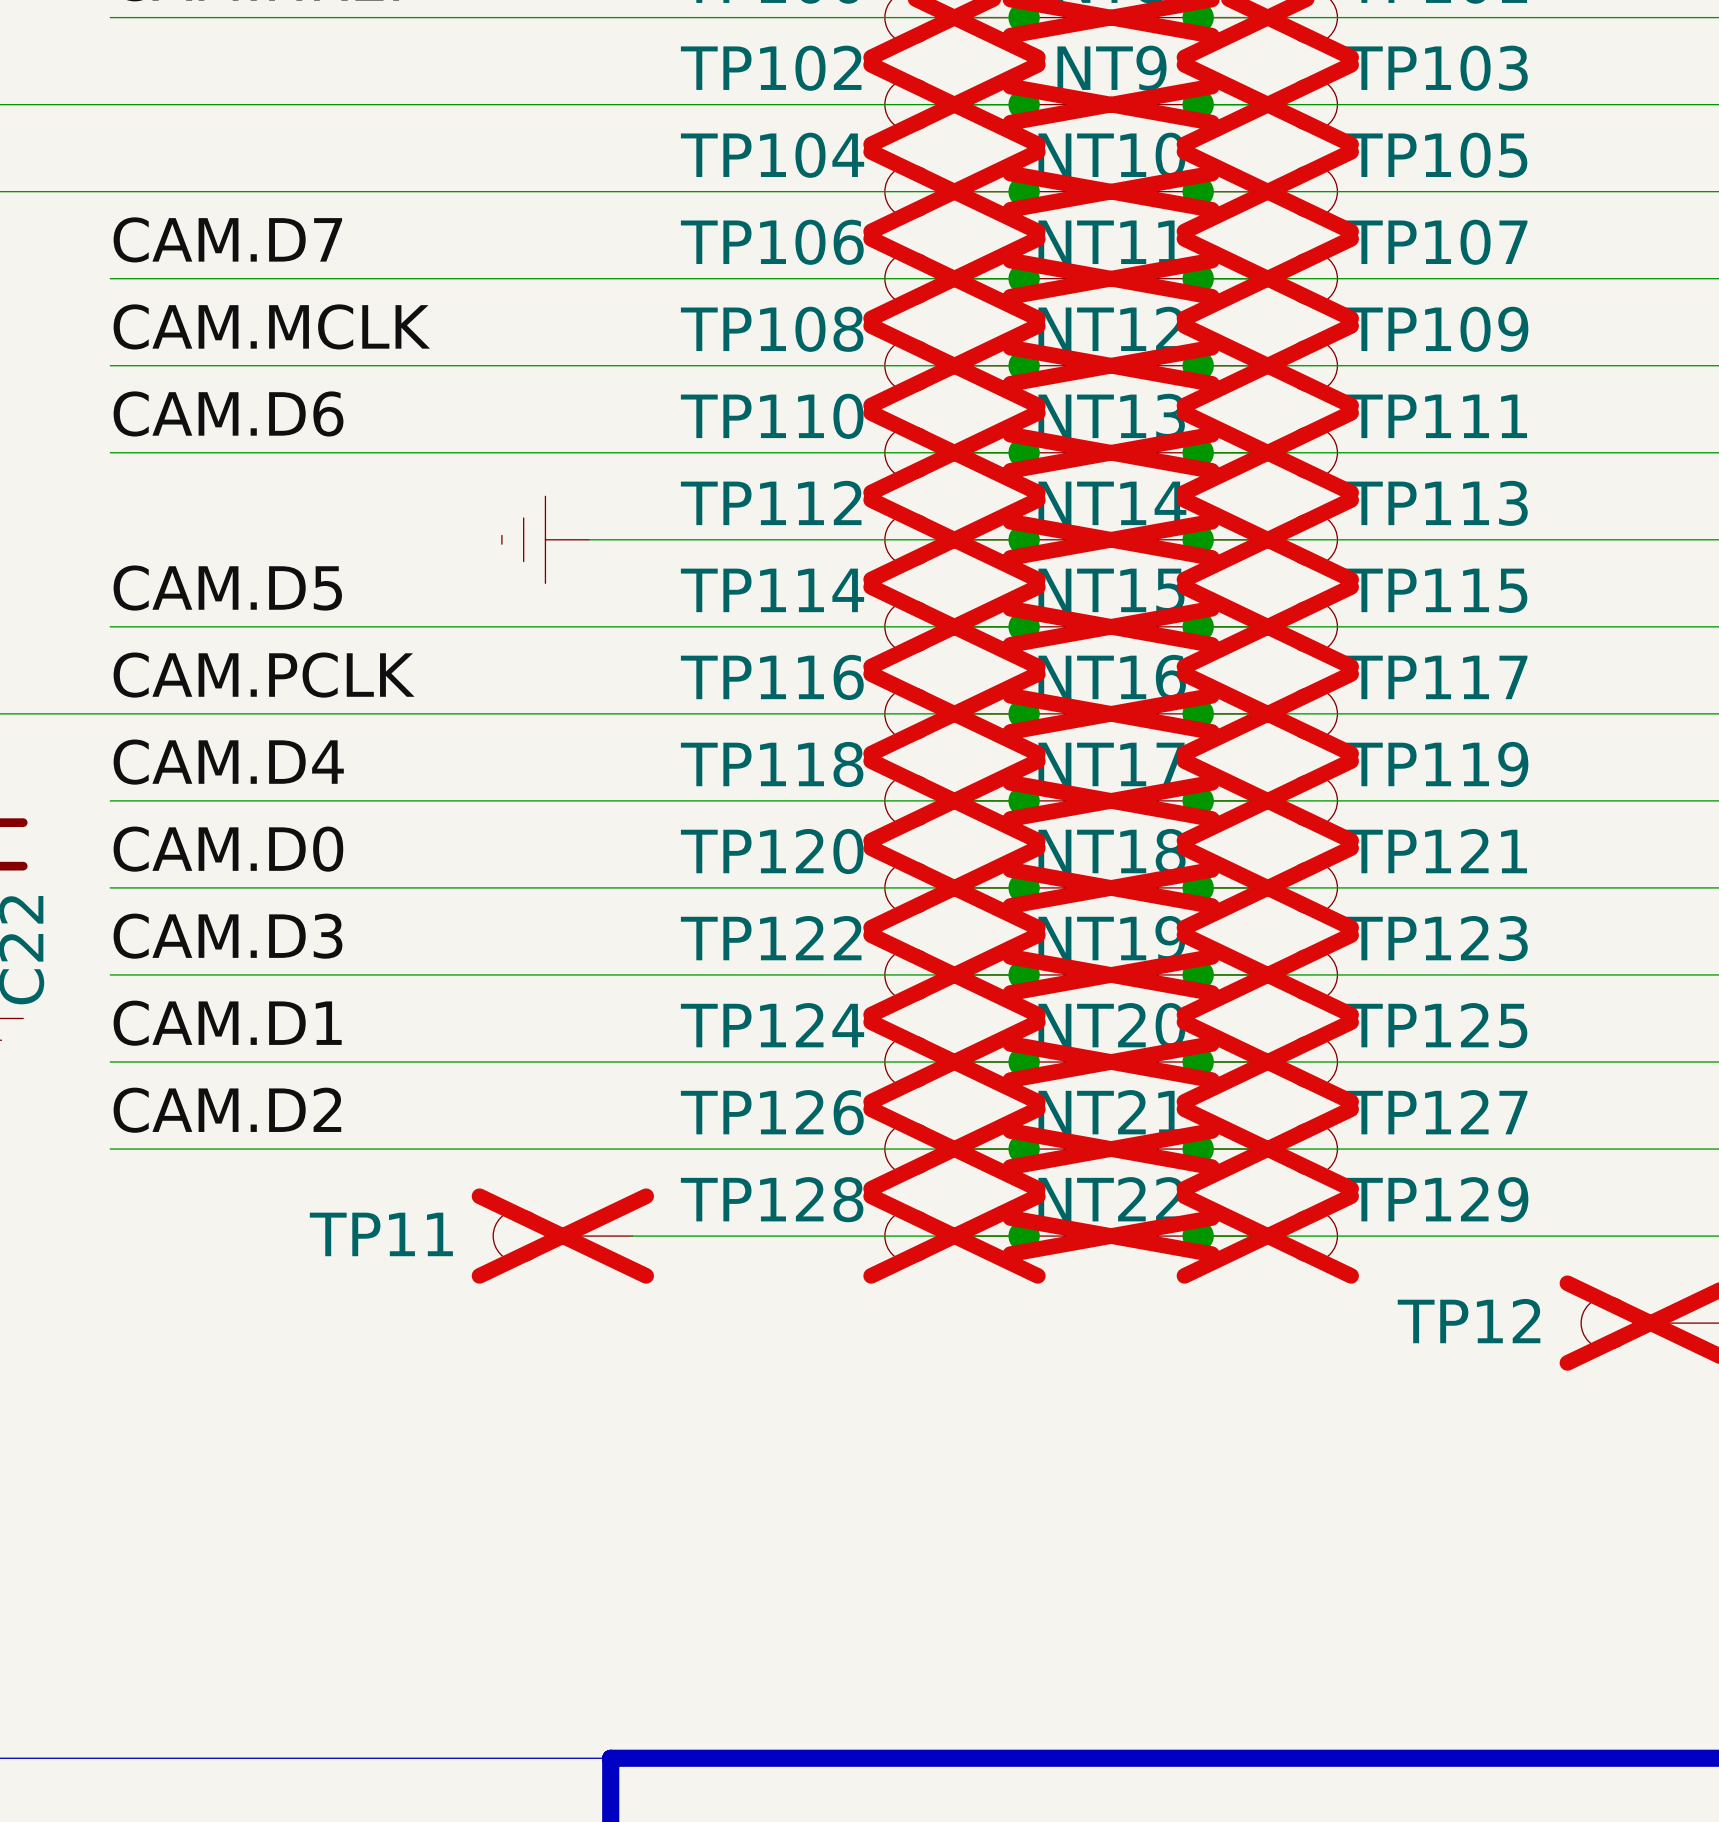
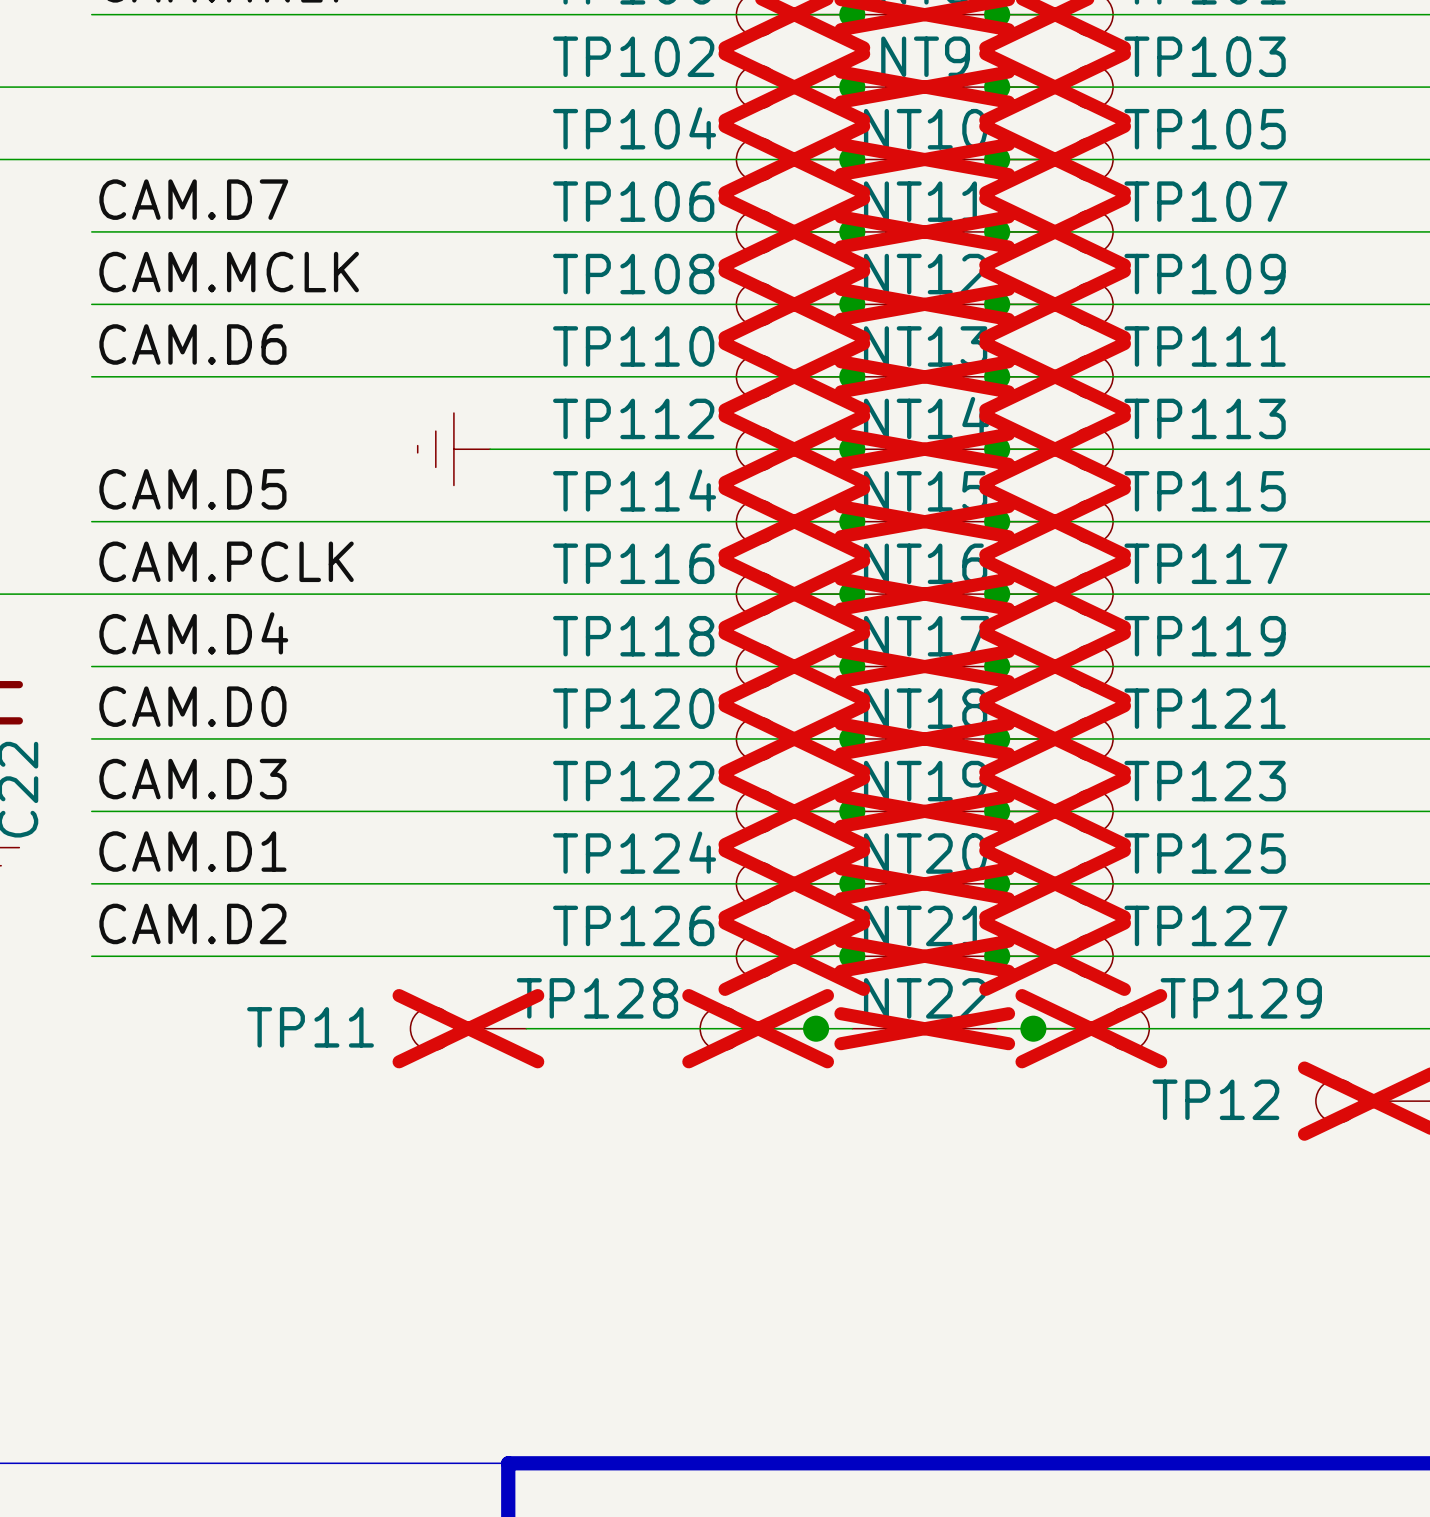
TP128 position: (954, 1236) -> (758, 1028)
junction position: (1024, 1236) -> (816, 1028)
junction position: (1198, 1236) -> (1033, 1028)
TP129 position: (1267, 1236) -> (1091, 1028)

